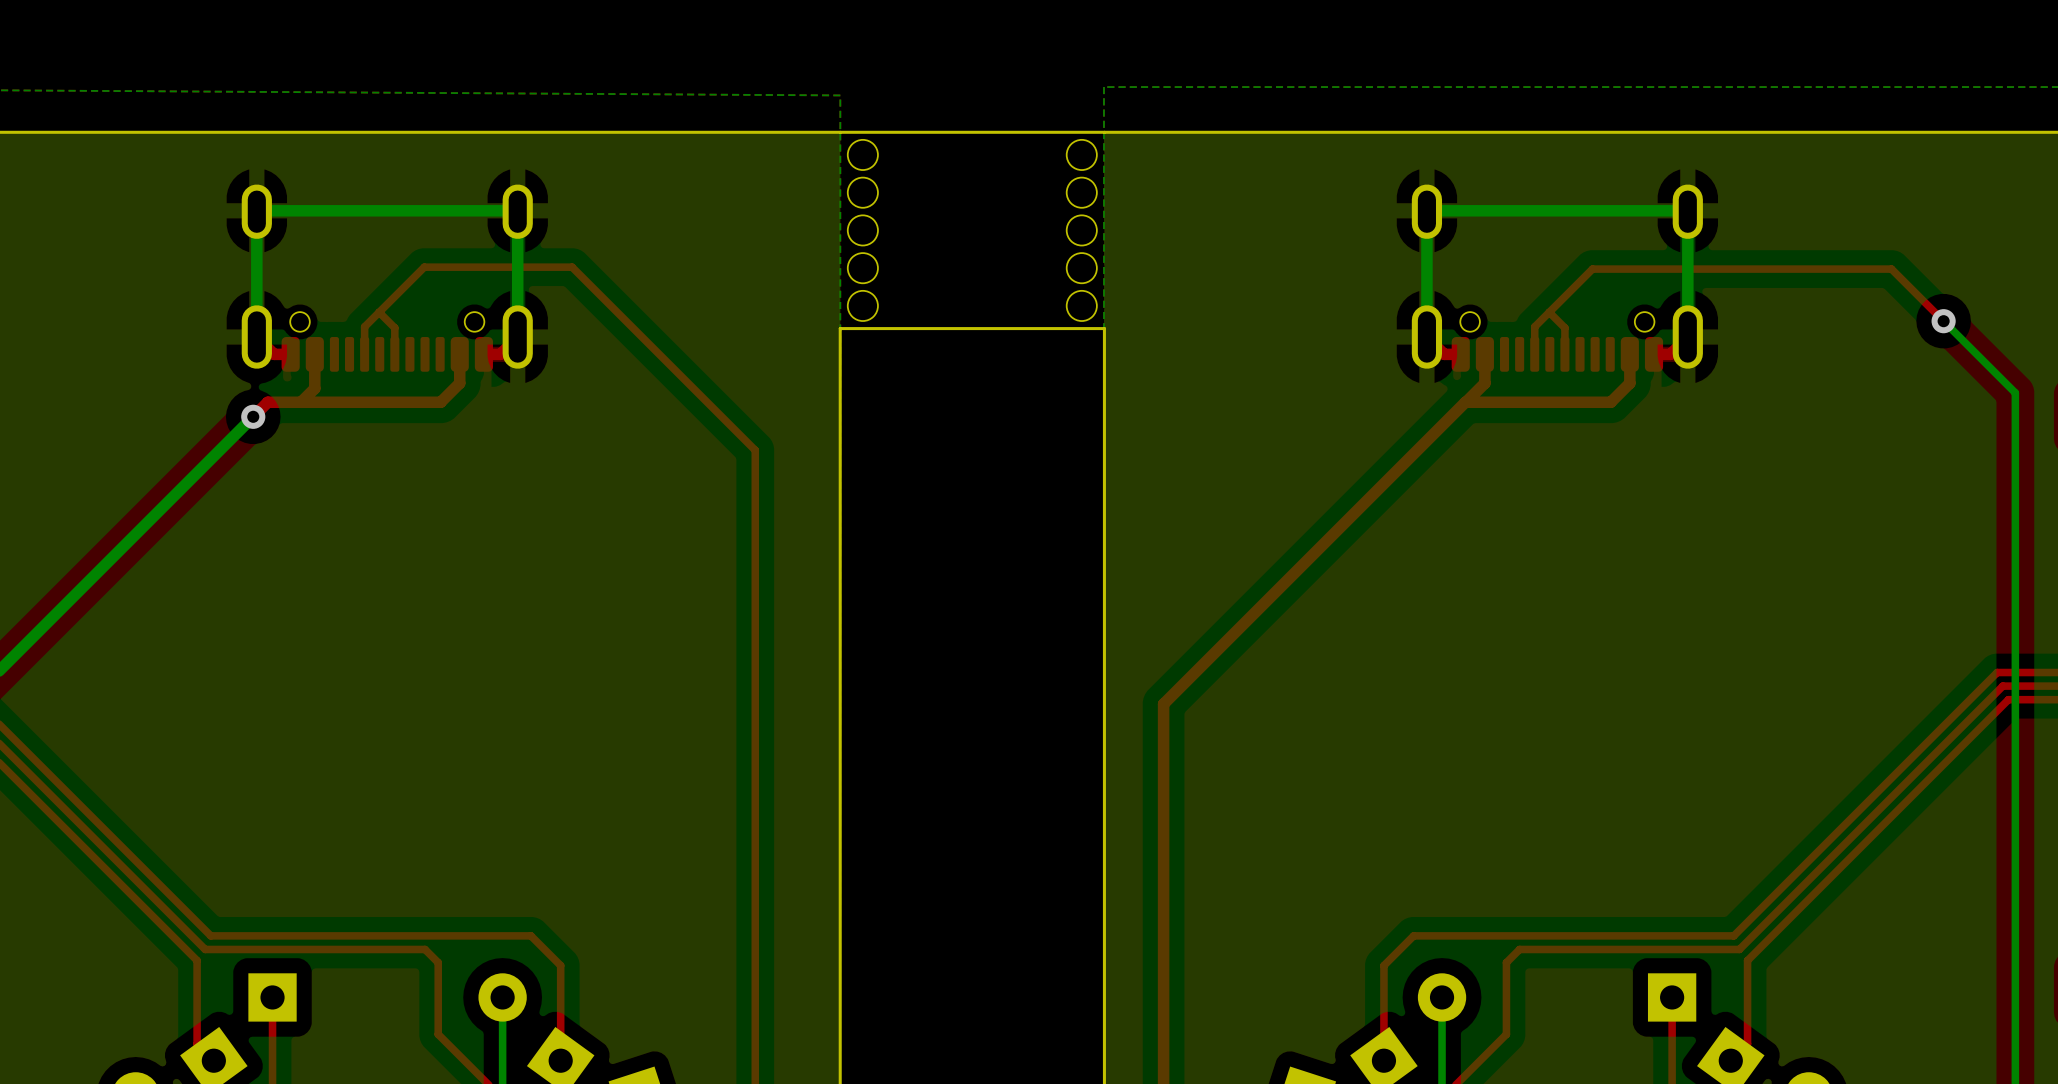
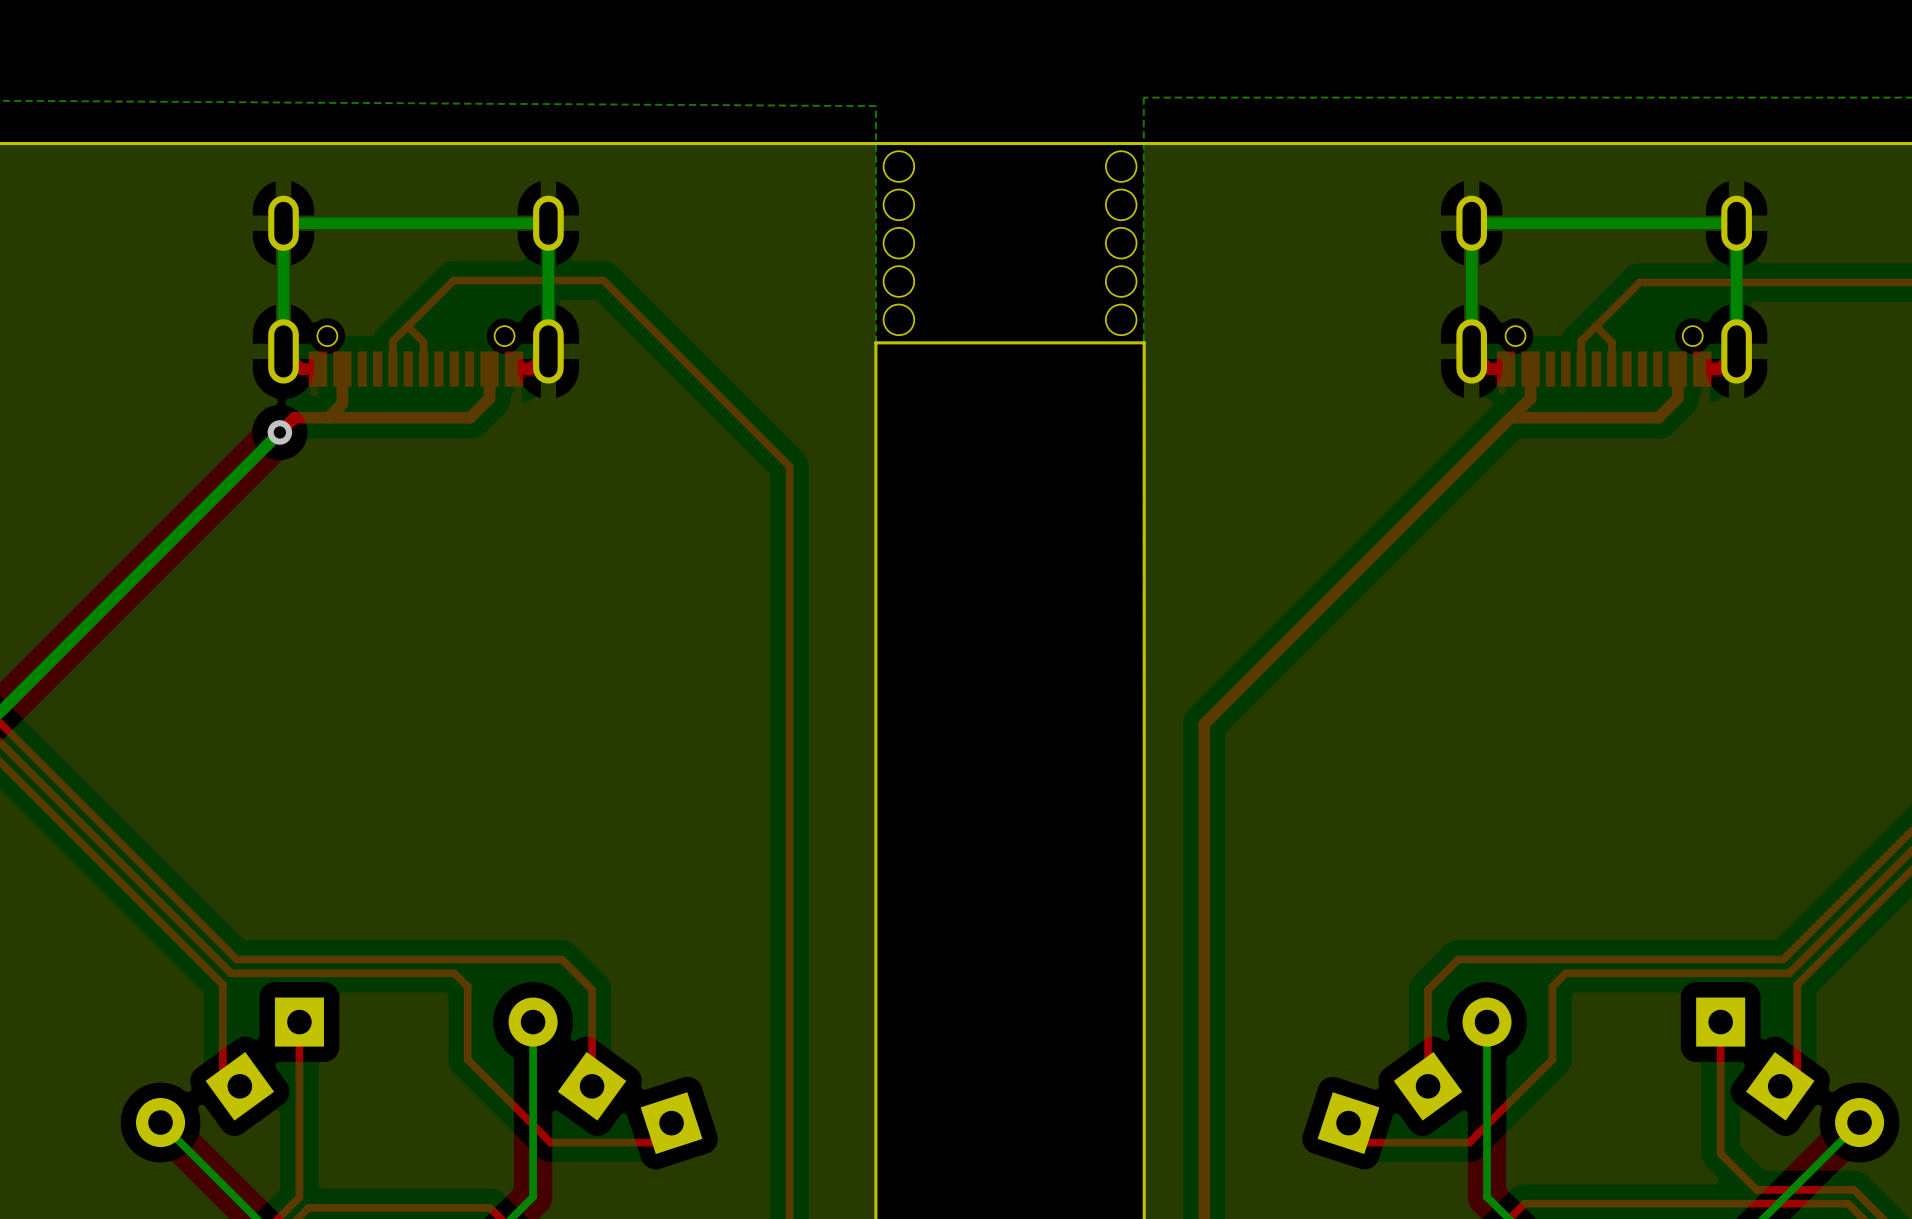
part footprint: [241, 184, 533, 372] -> [268, 195, 564, 387]
part footprint: [1411, 184, 1703, 372] -> [1456, 195, 1752, 387]

